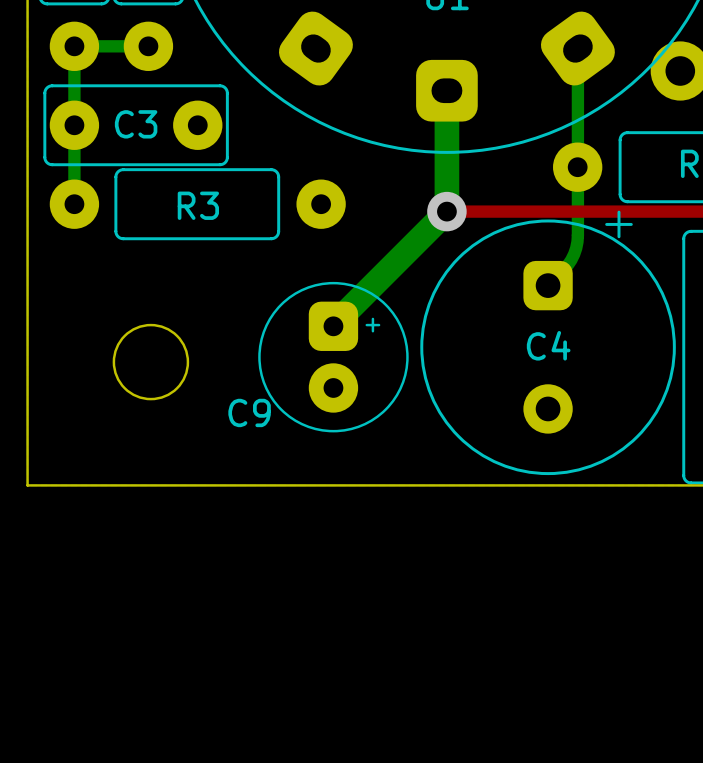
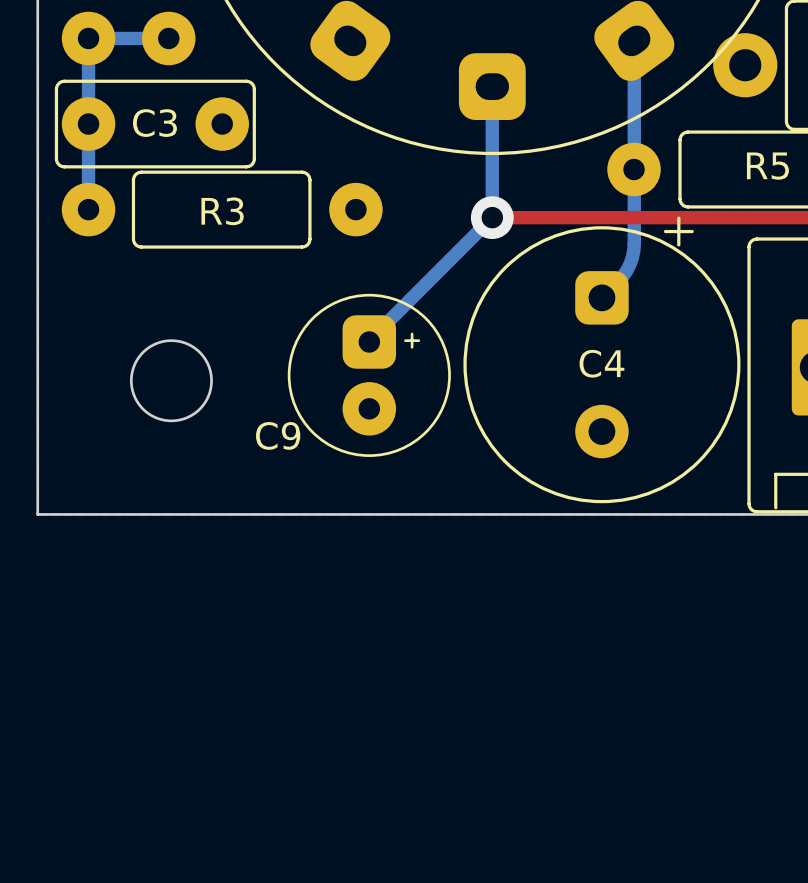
bottom track width: thick (446, 90) (446, 211) (333, 325) -> thin (492, 86) (492, 217) (369, 340)

